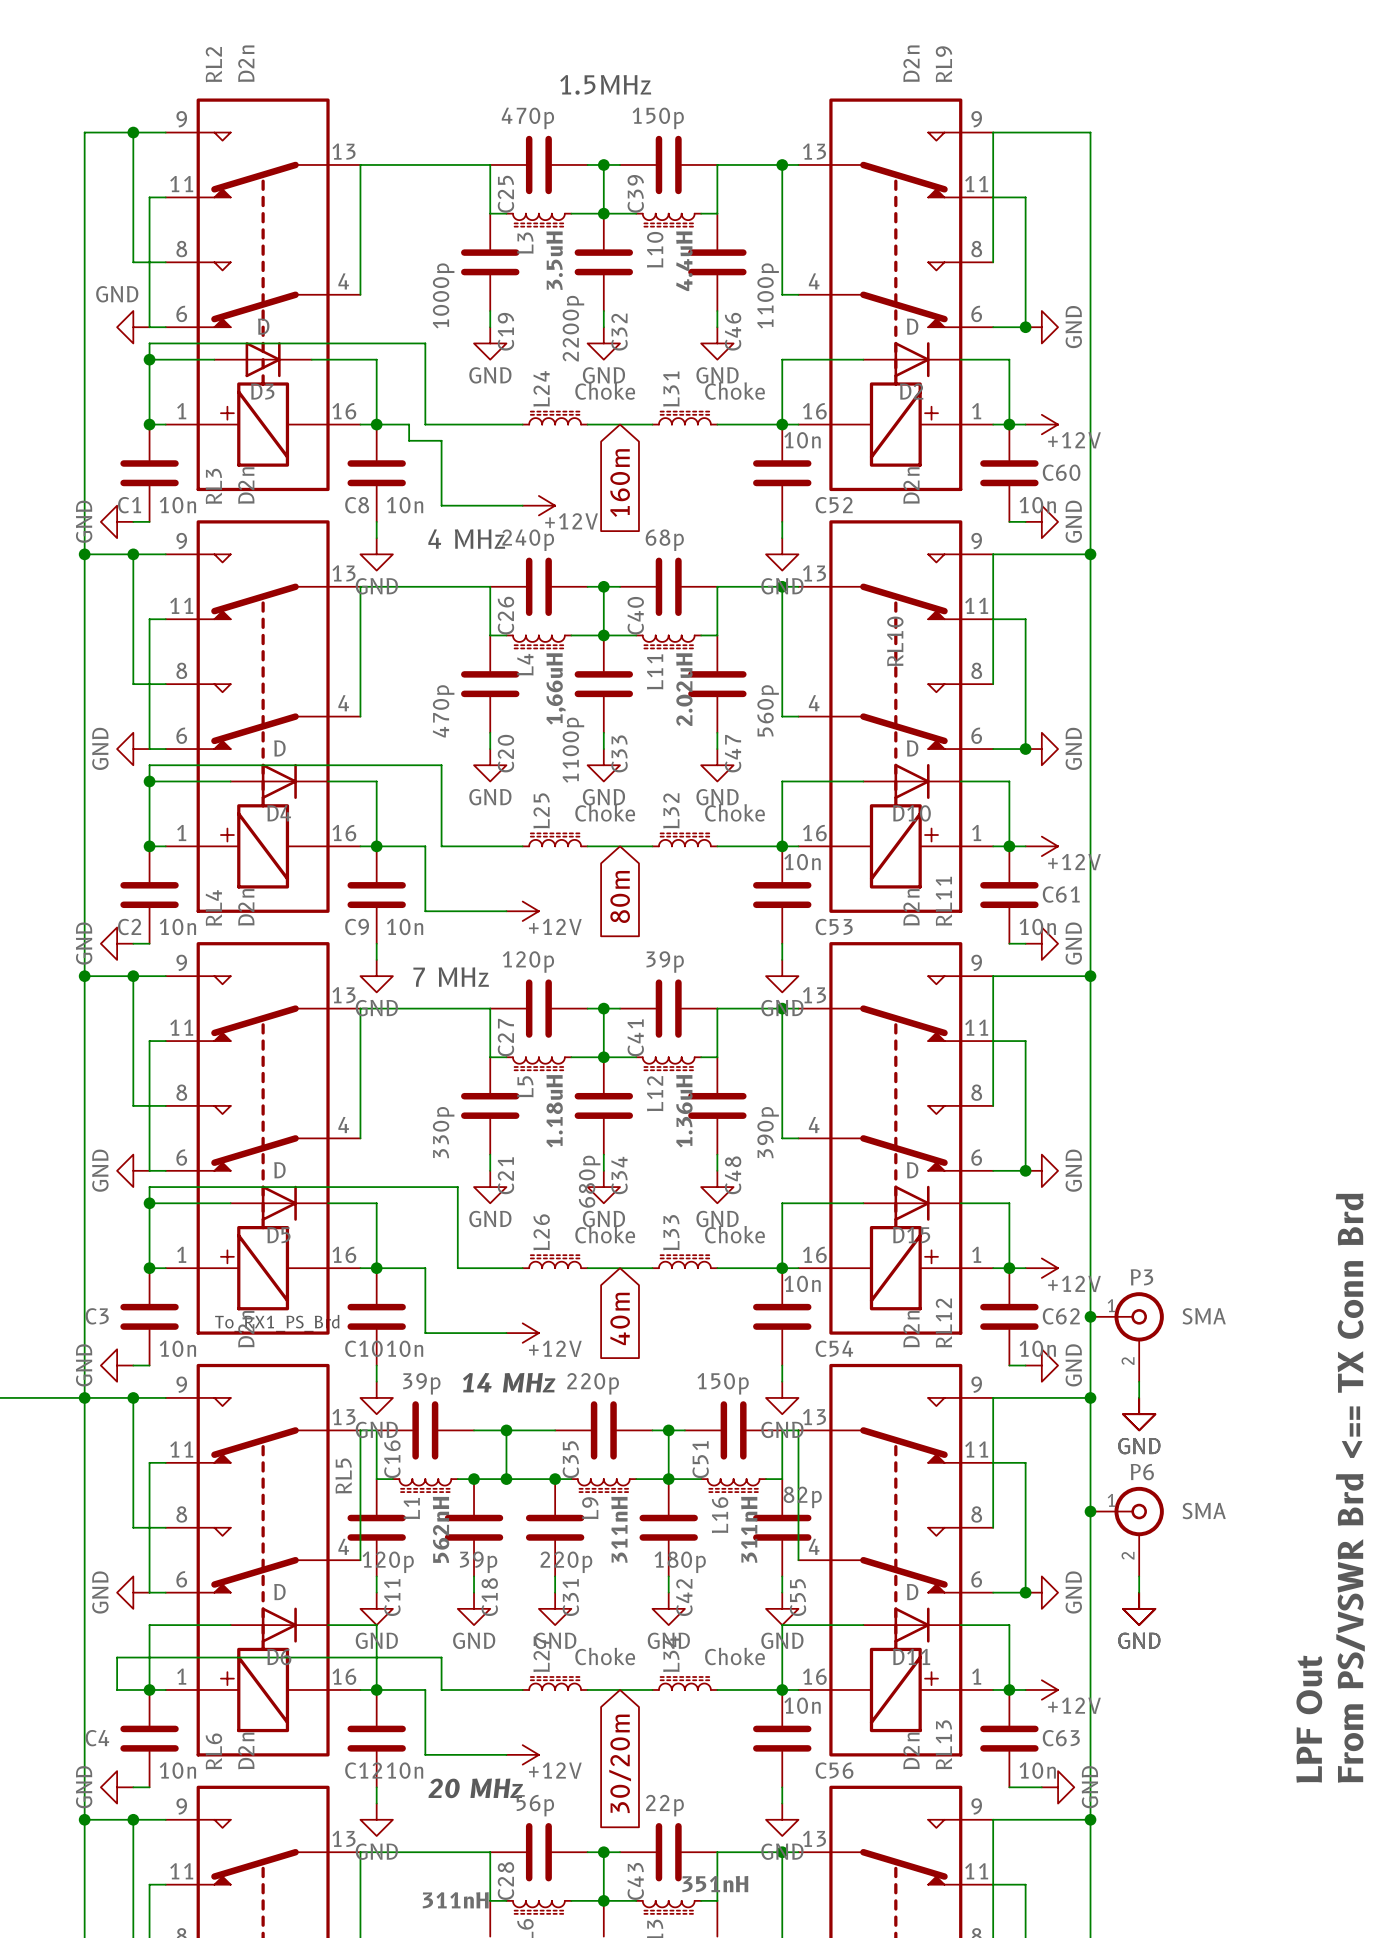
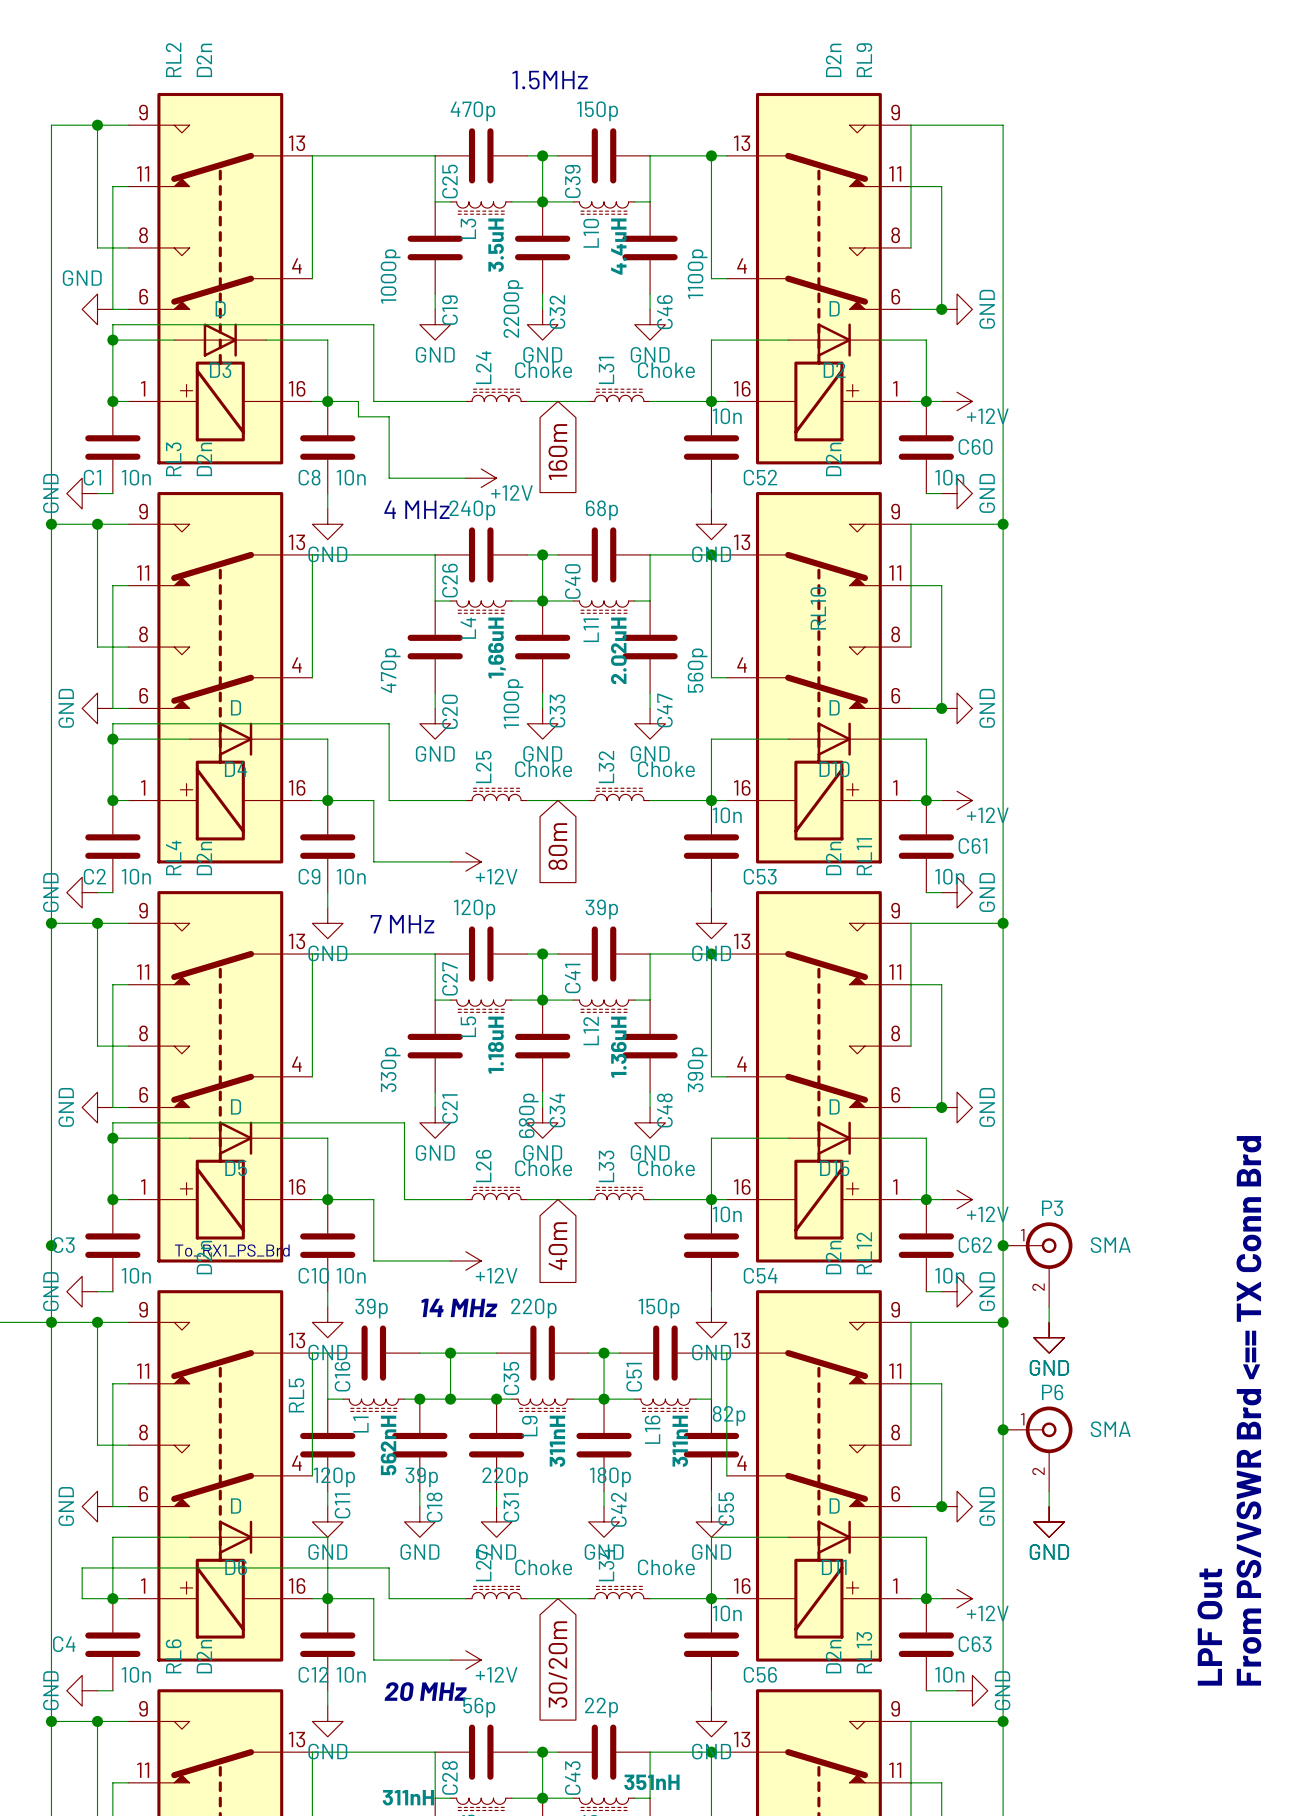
junction: none -> (51, 1245)

